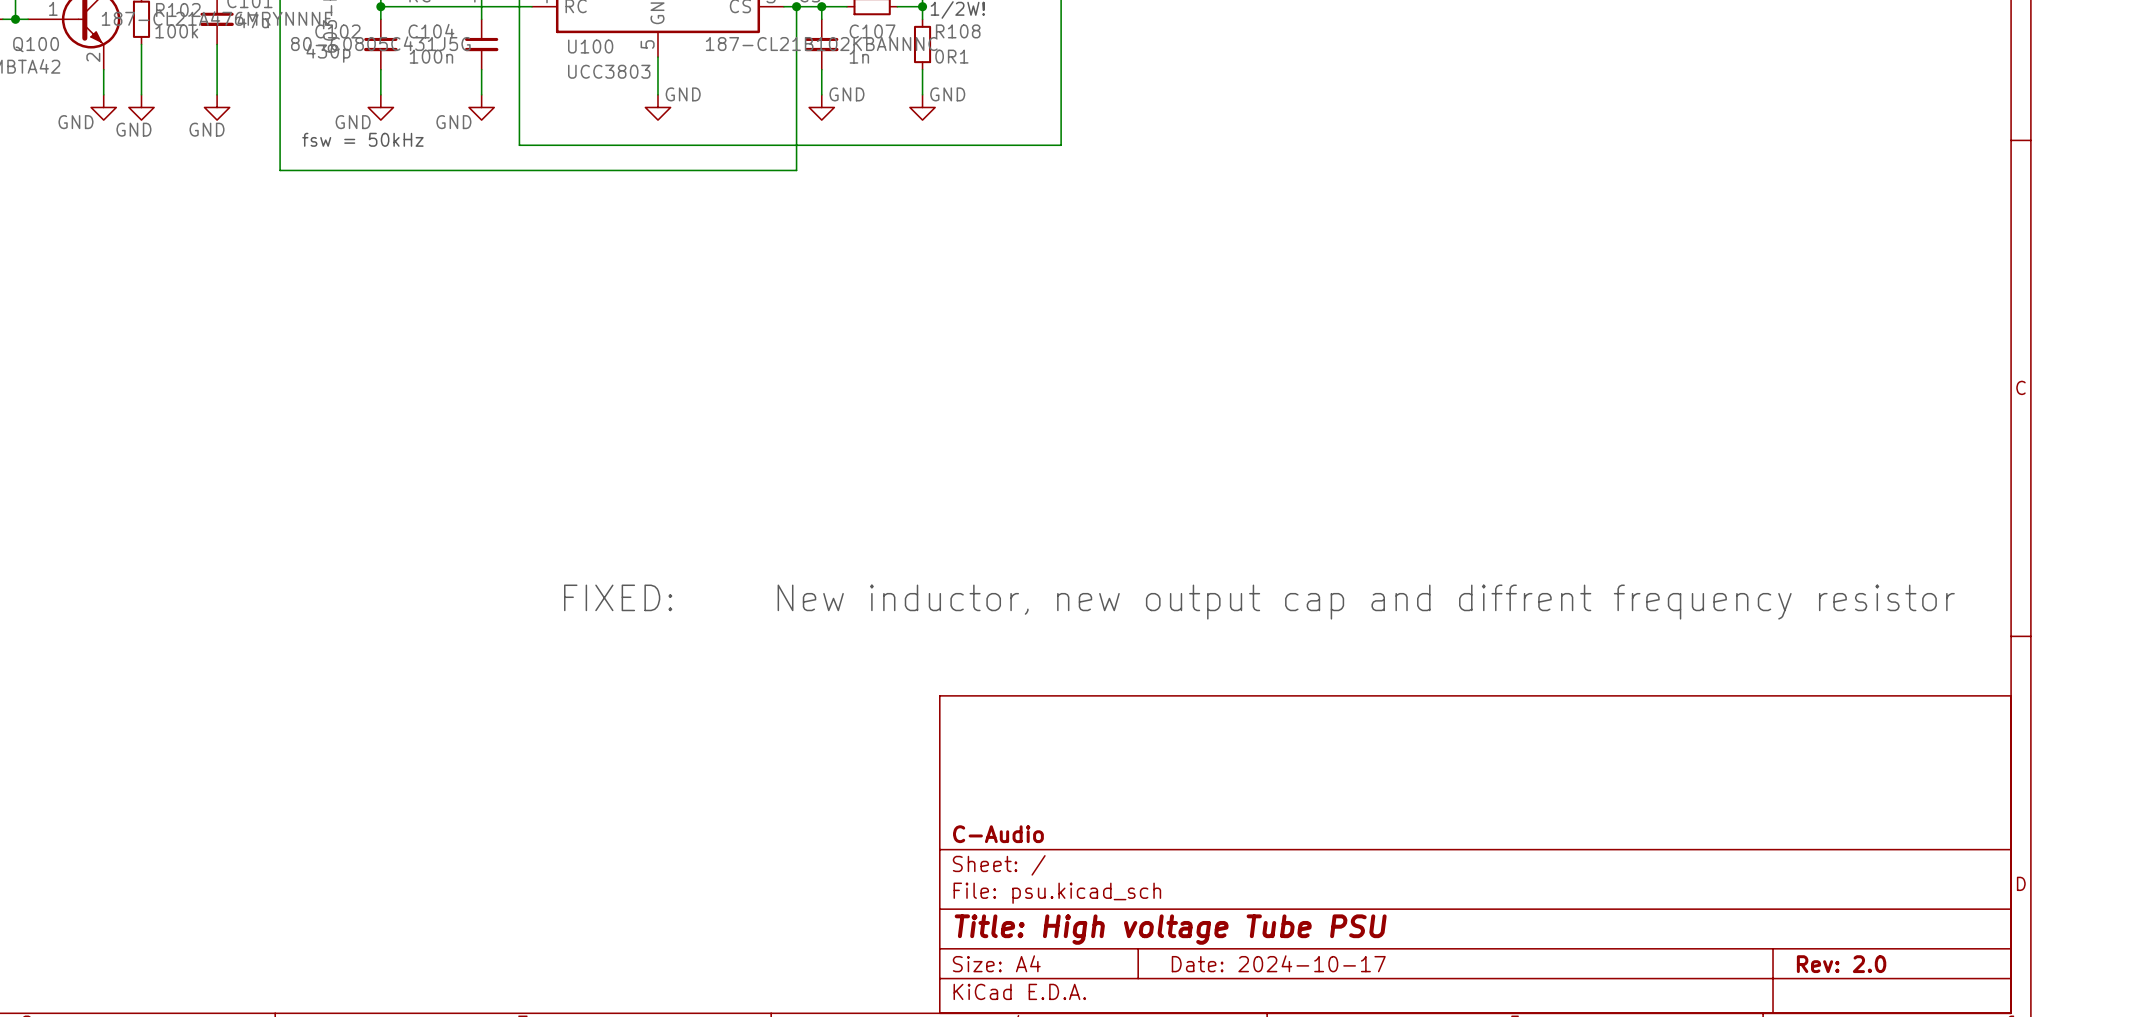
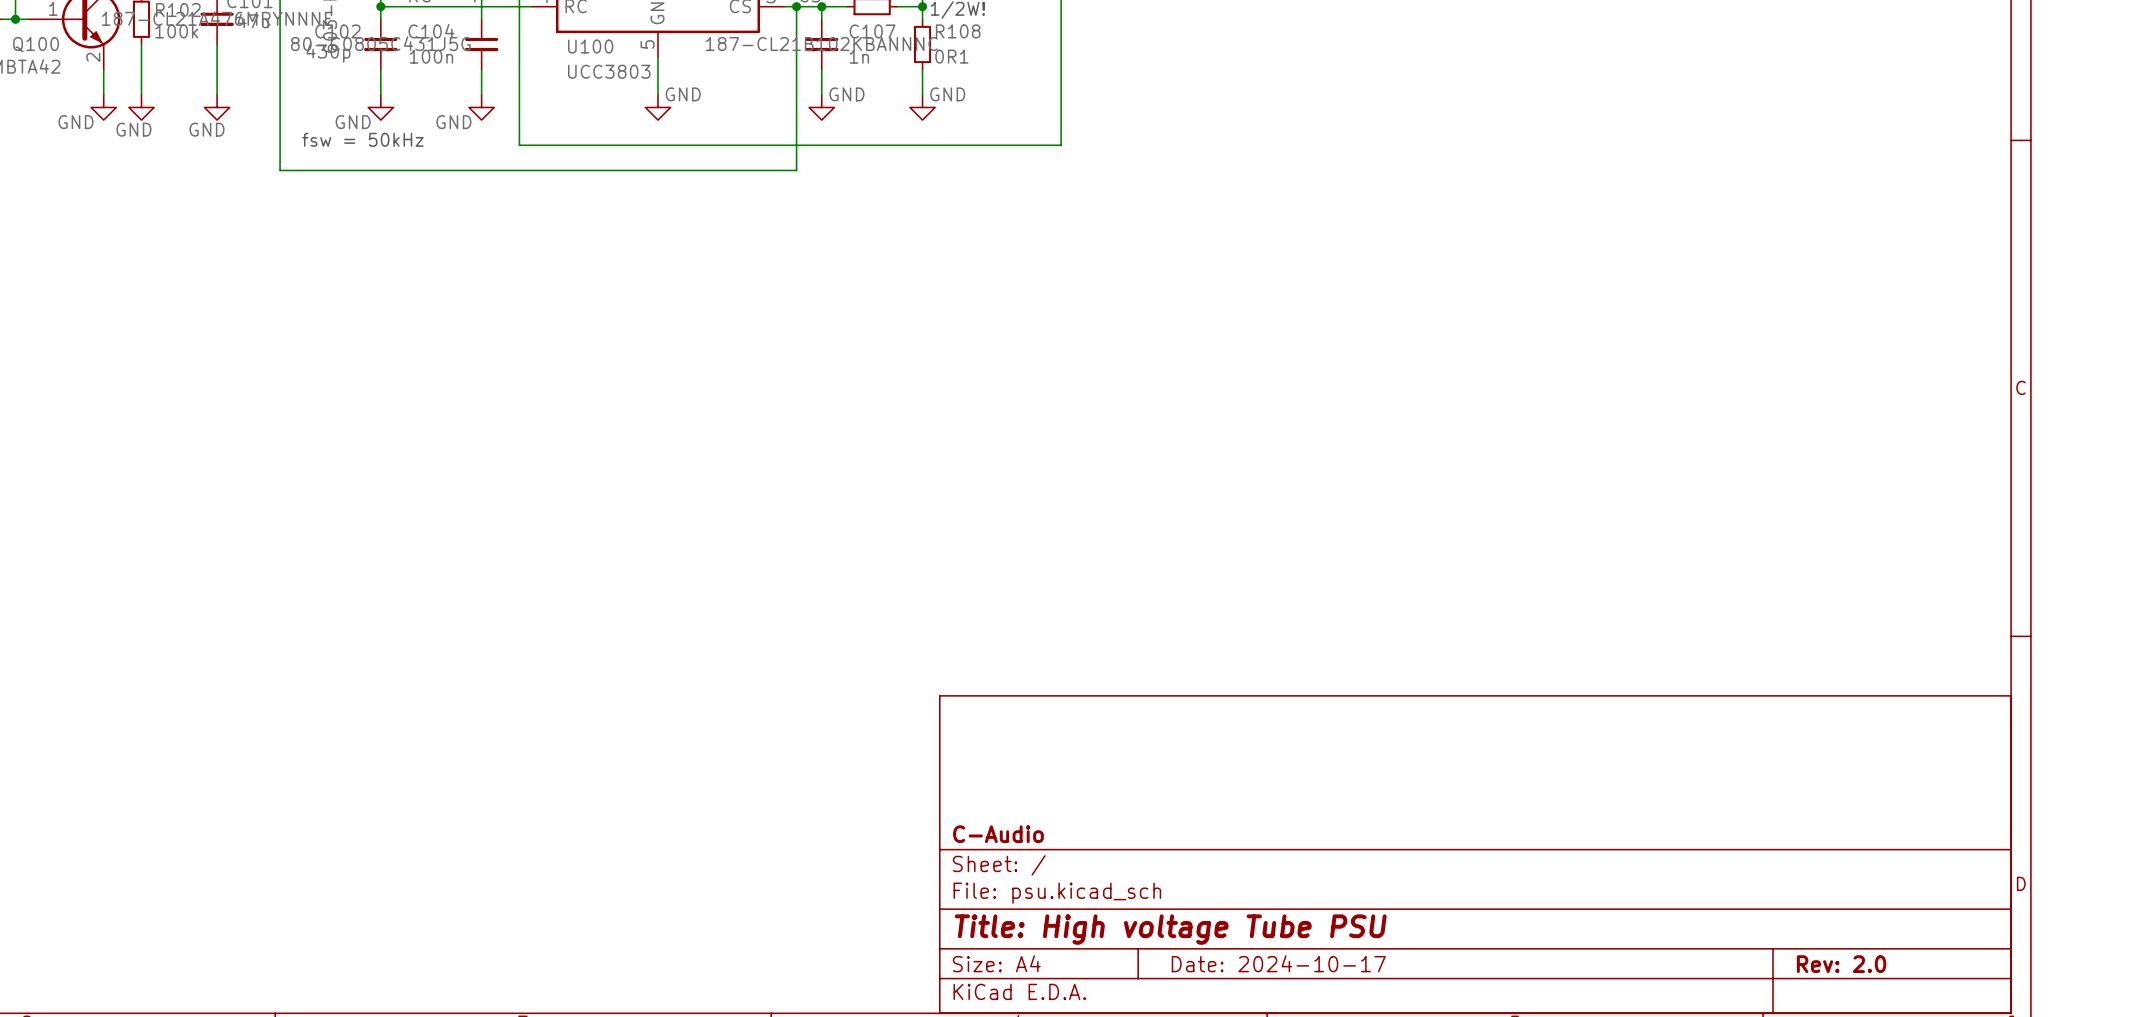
text: FIXED: New inductor, new output cap and diffrent frequency resistor (1259, 602) -> none

